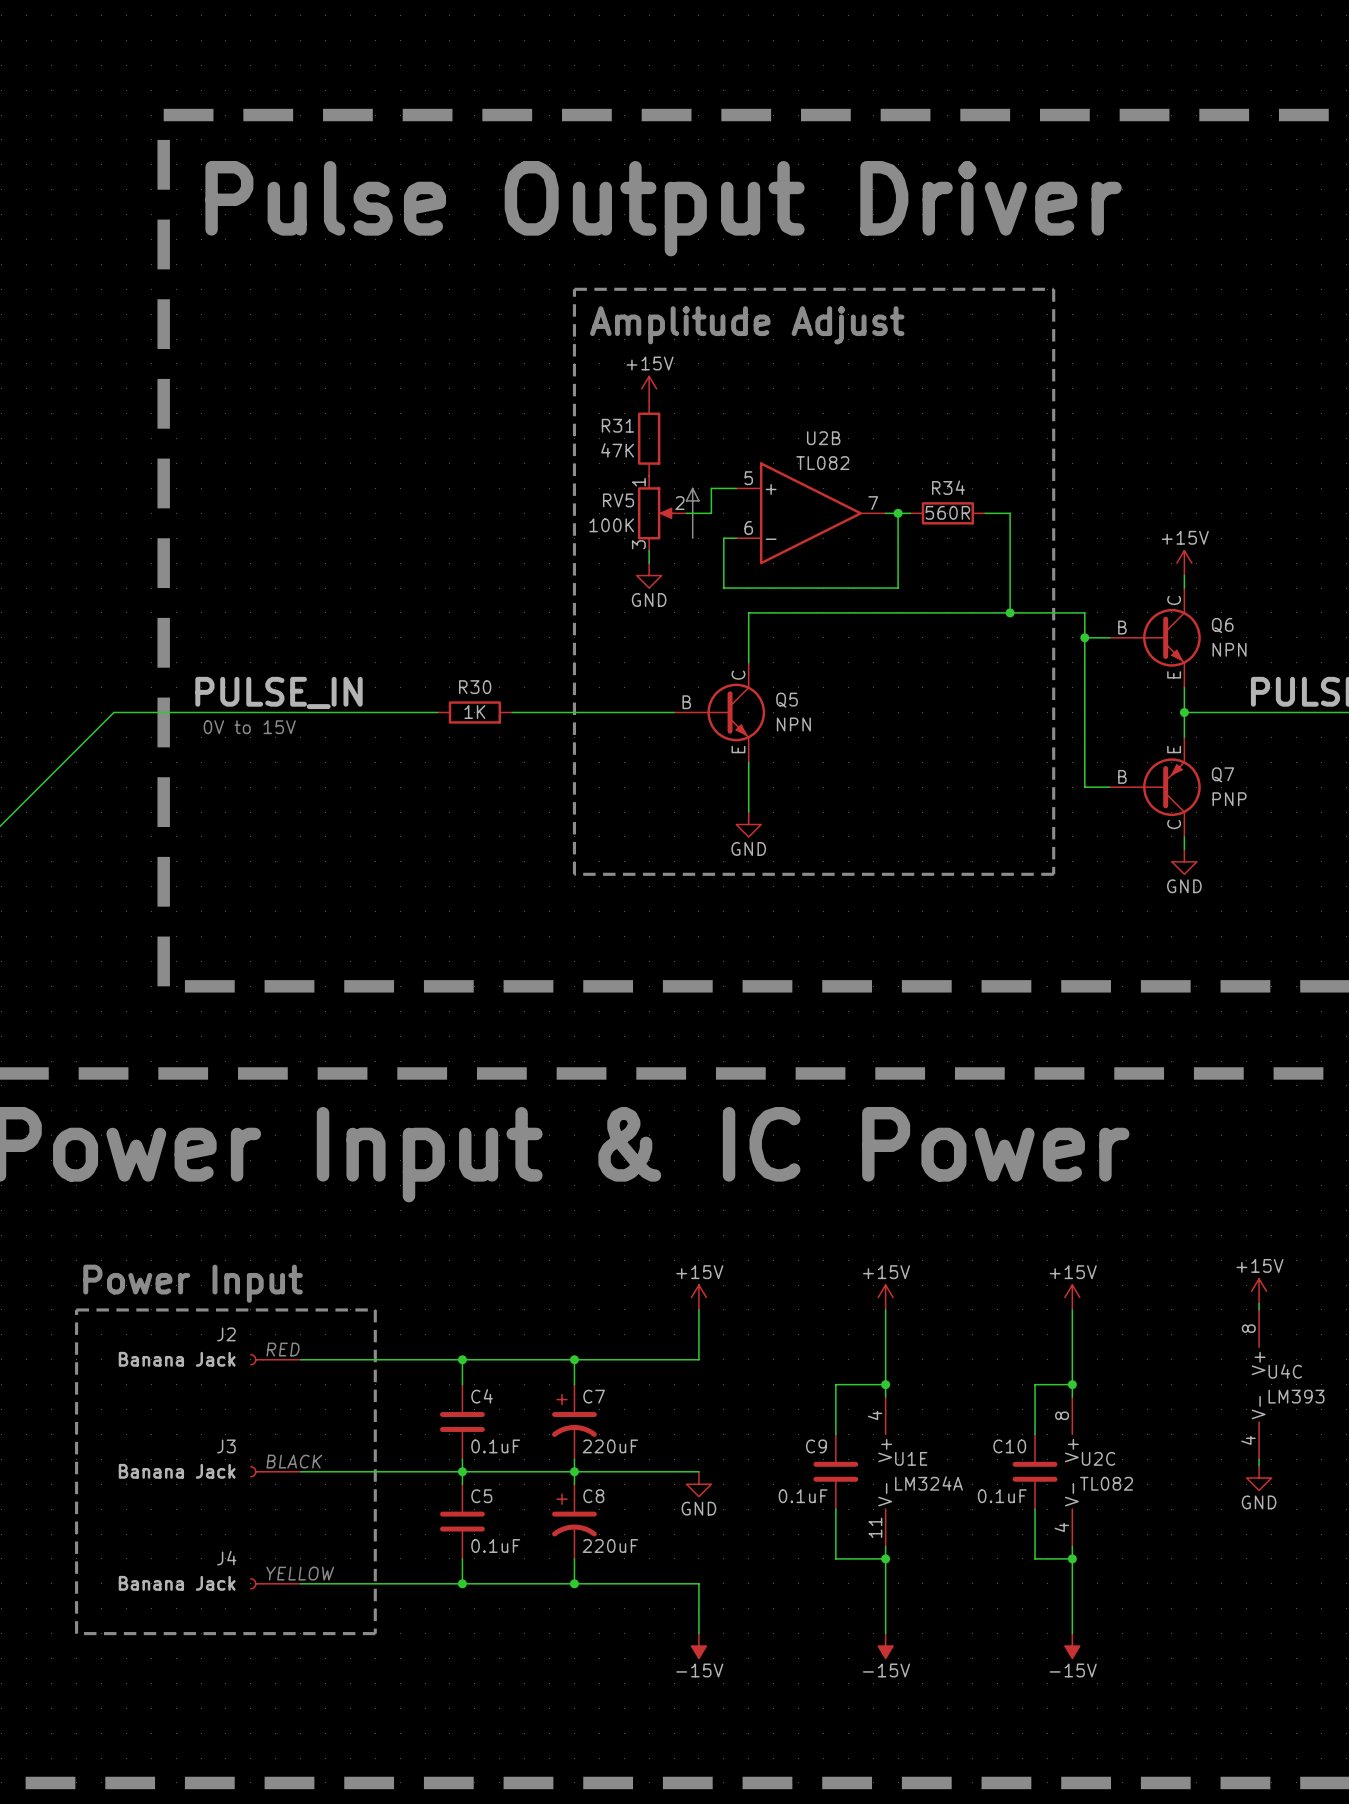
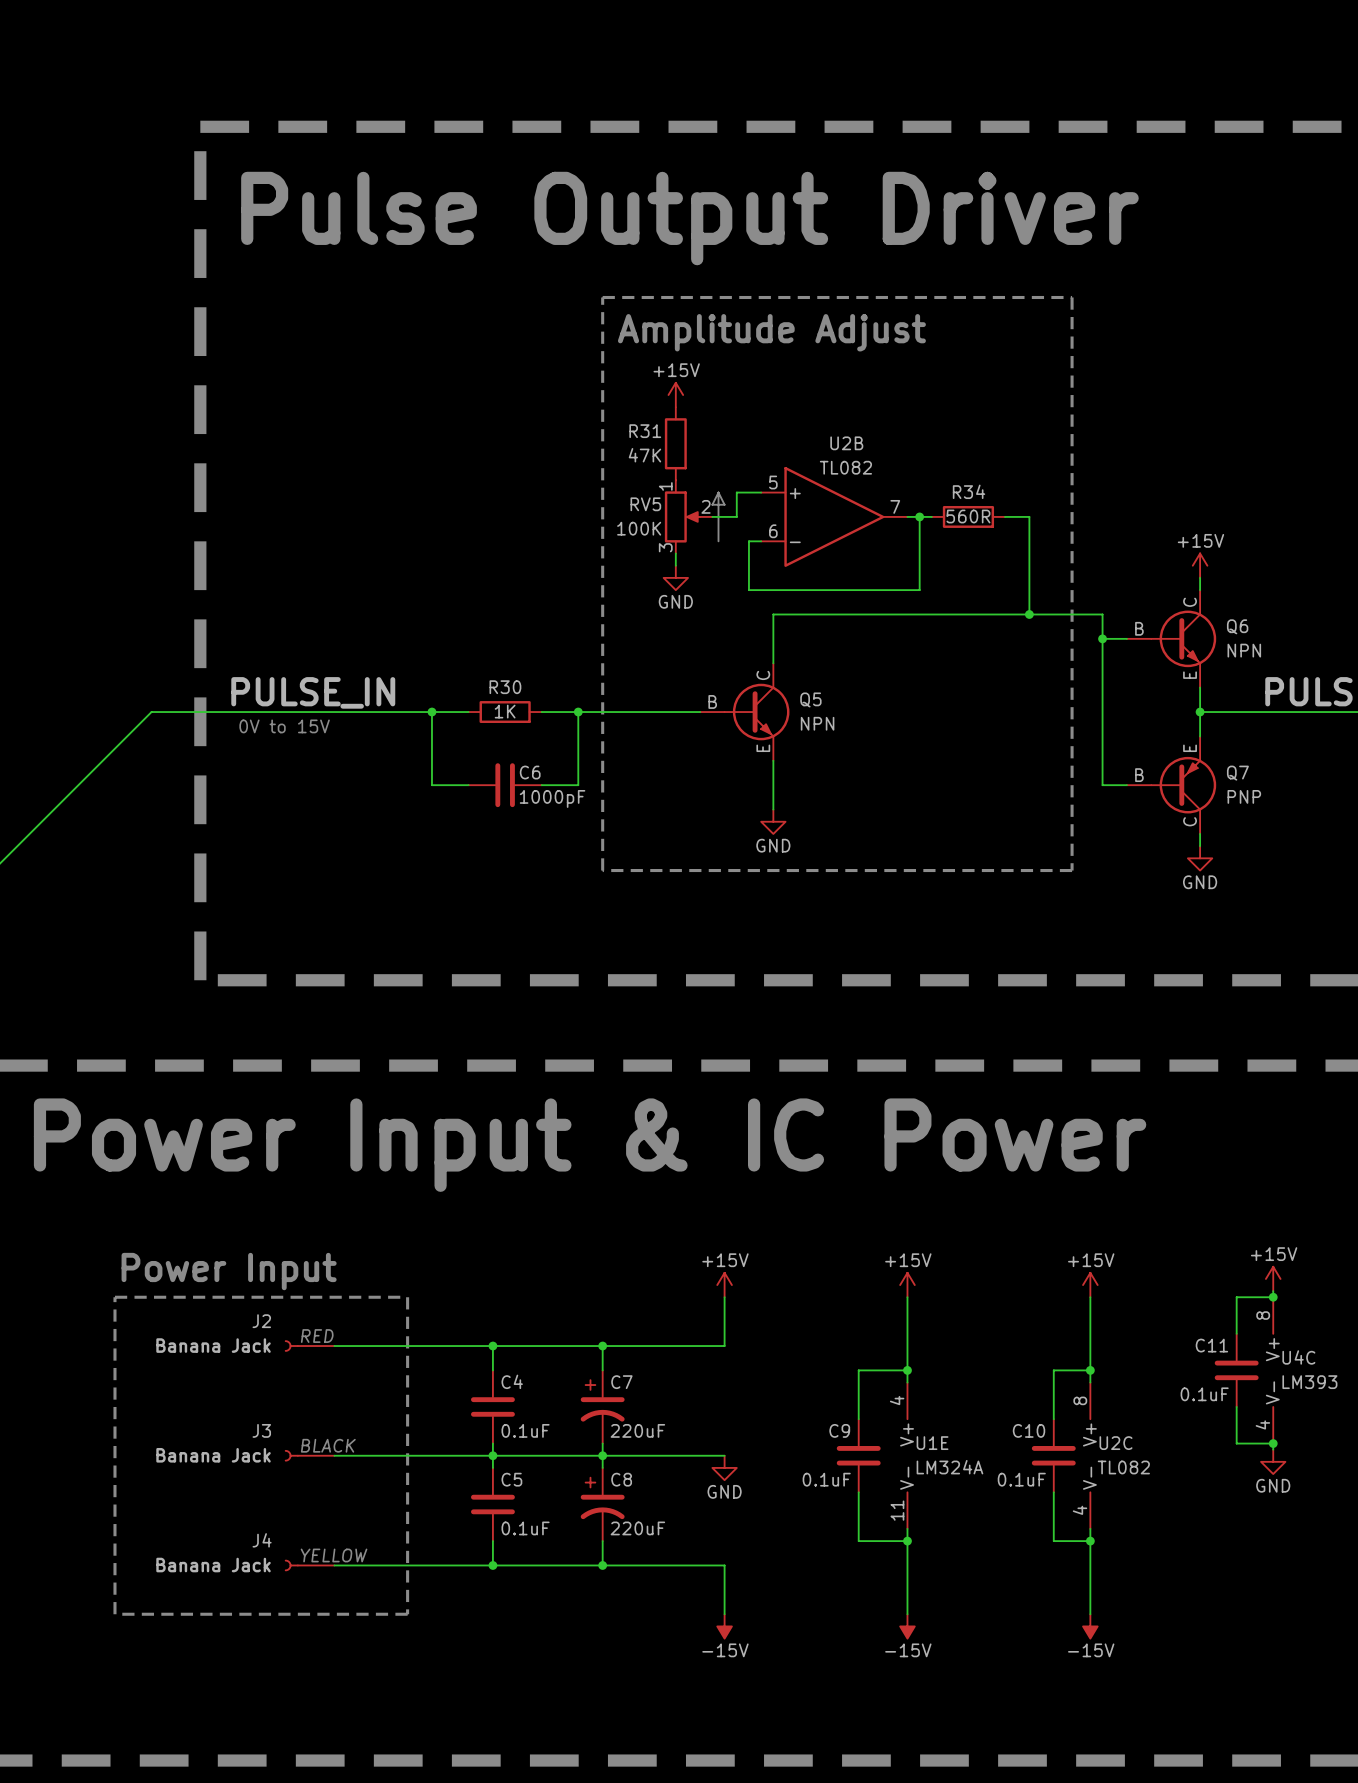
wire: none -> (431, 712) (431, 785) (468, 785)
junction: none -> (431, 712)
wire: none -> (578, 712) (578, 785) (541, 785)
junction: none -> (578, 712)
C6: none -> 1000pF (505, 785)
wire: none -> (1273, 1297) (1236, 1297) (1236, 1333)
junction: none -> (1273, 1297)
C11: none -> 0.1uF (1236, 1370)
wire: none -> (1236, 1406) (1236, 1443) (1273, 1443)
junction: none -> (1273, 1443)

